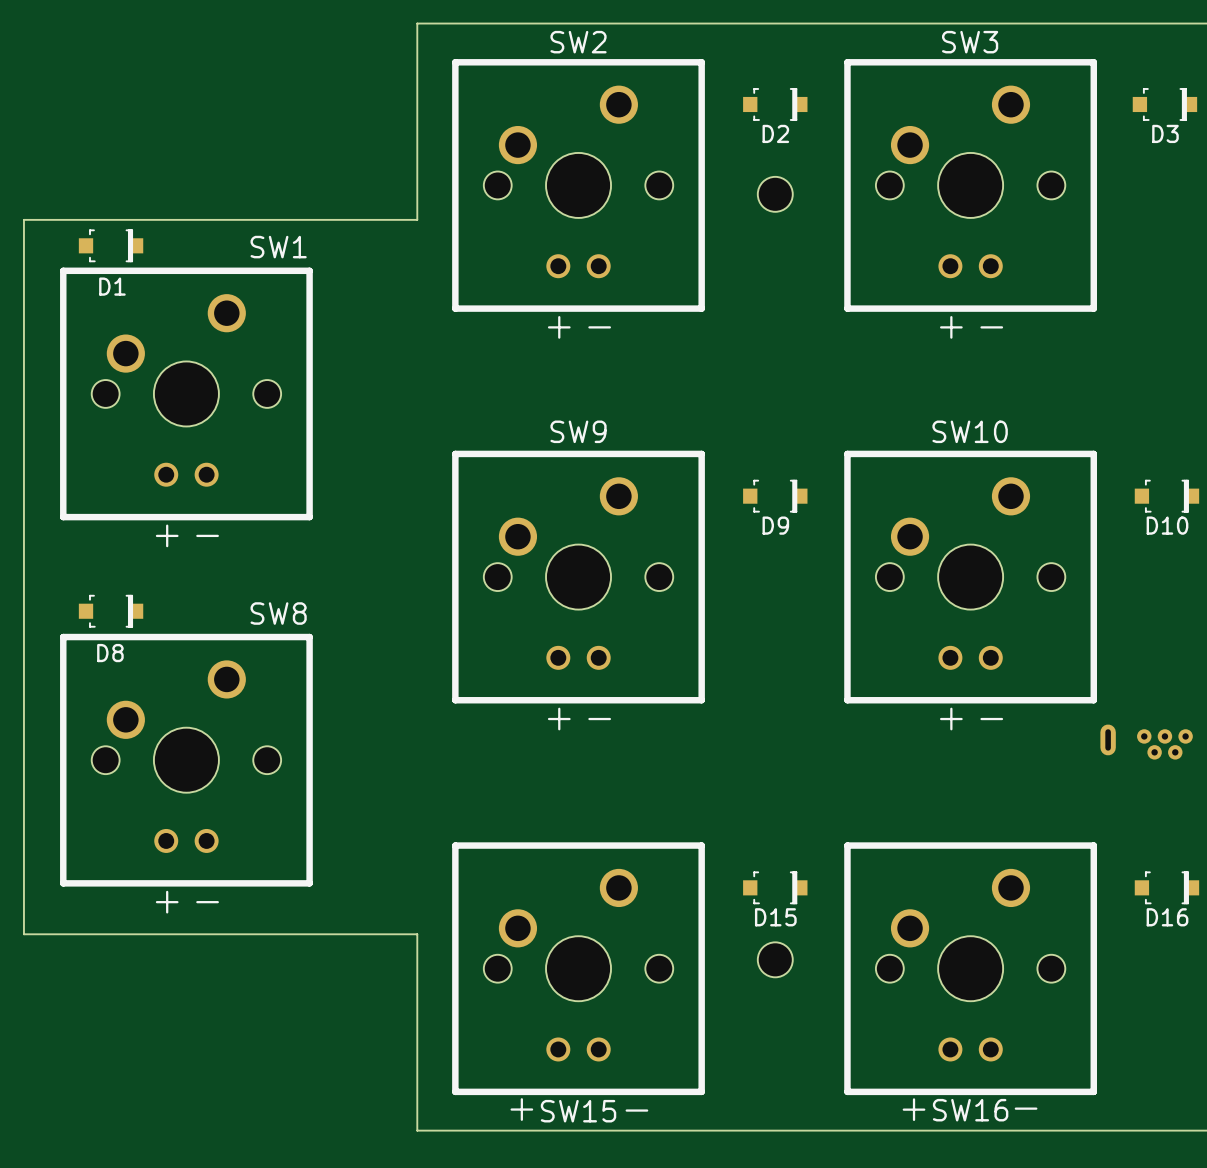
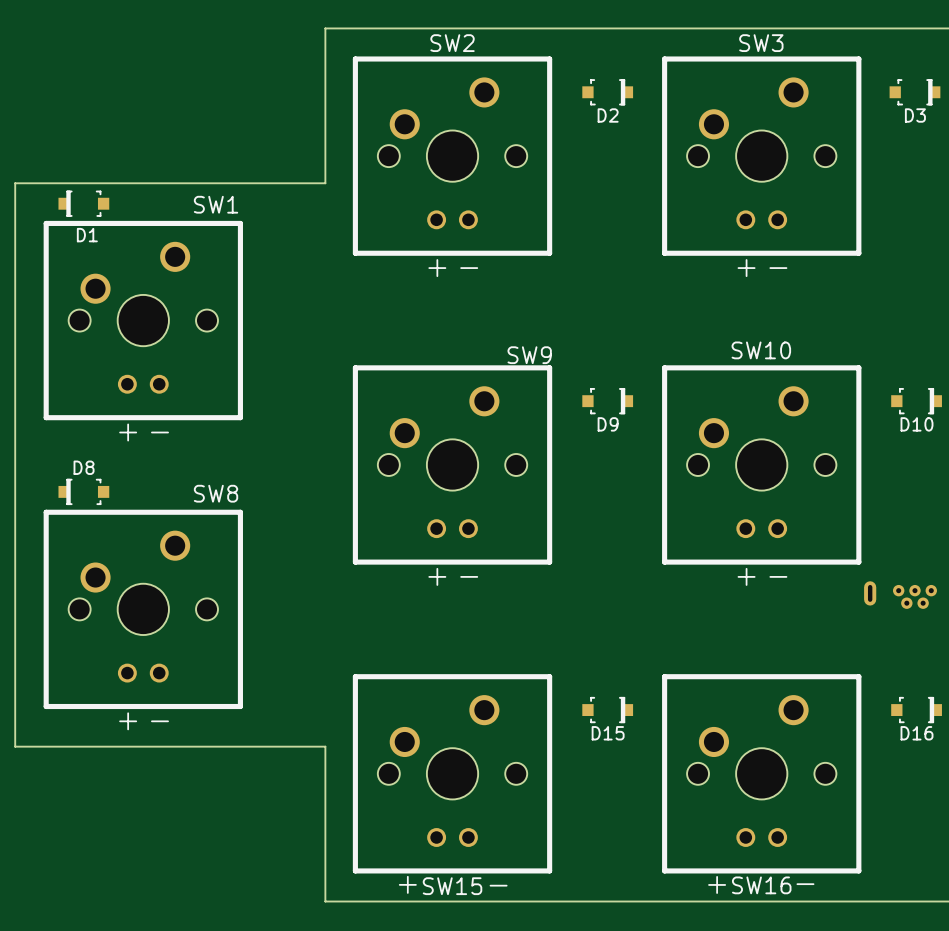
part: (775, 194) -> none
D1 rotation: 0° (111, 245) -> 180° (83, 203)
SW9 name position: SW9 (578, 431) -> SW9 (529, 355)
D8 rotation: 0° (111, 611) -> 180° (83, 491)
part: (775, 959) -> none

